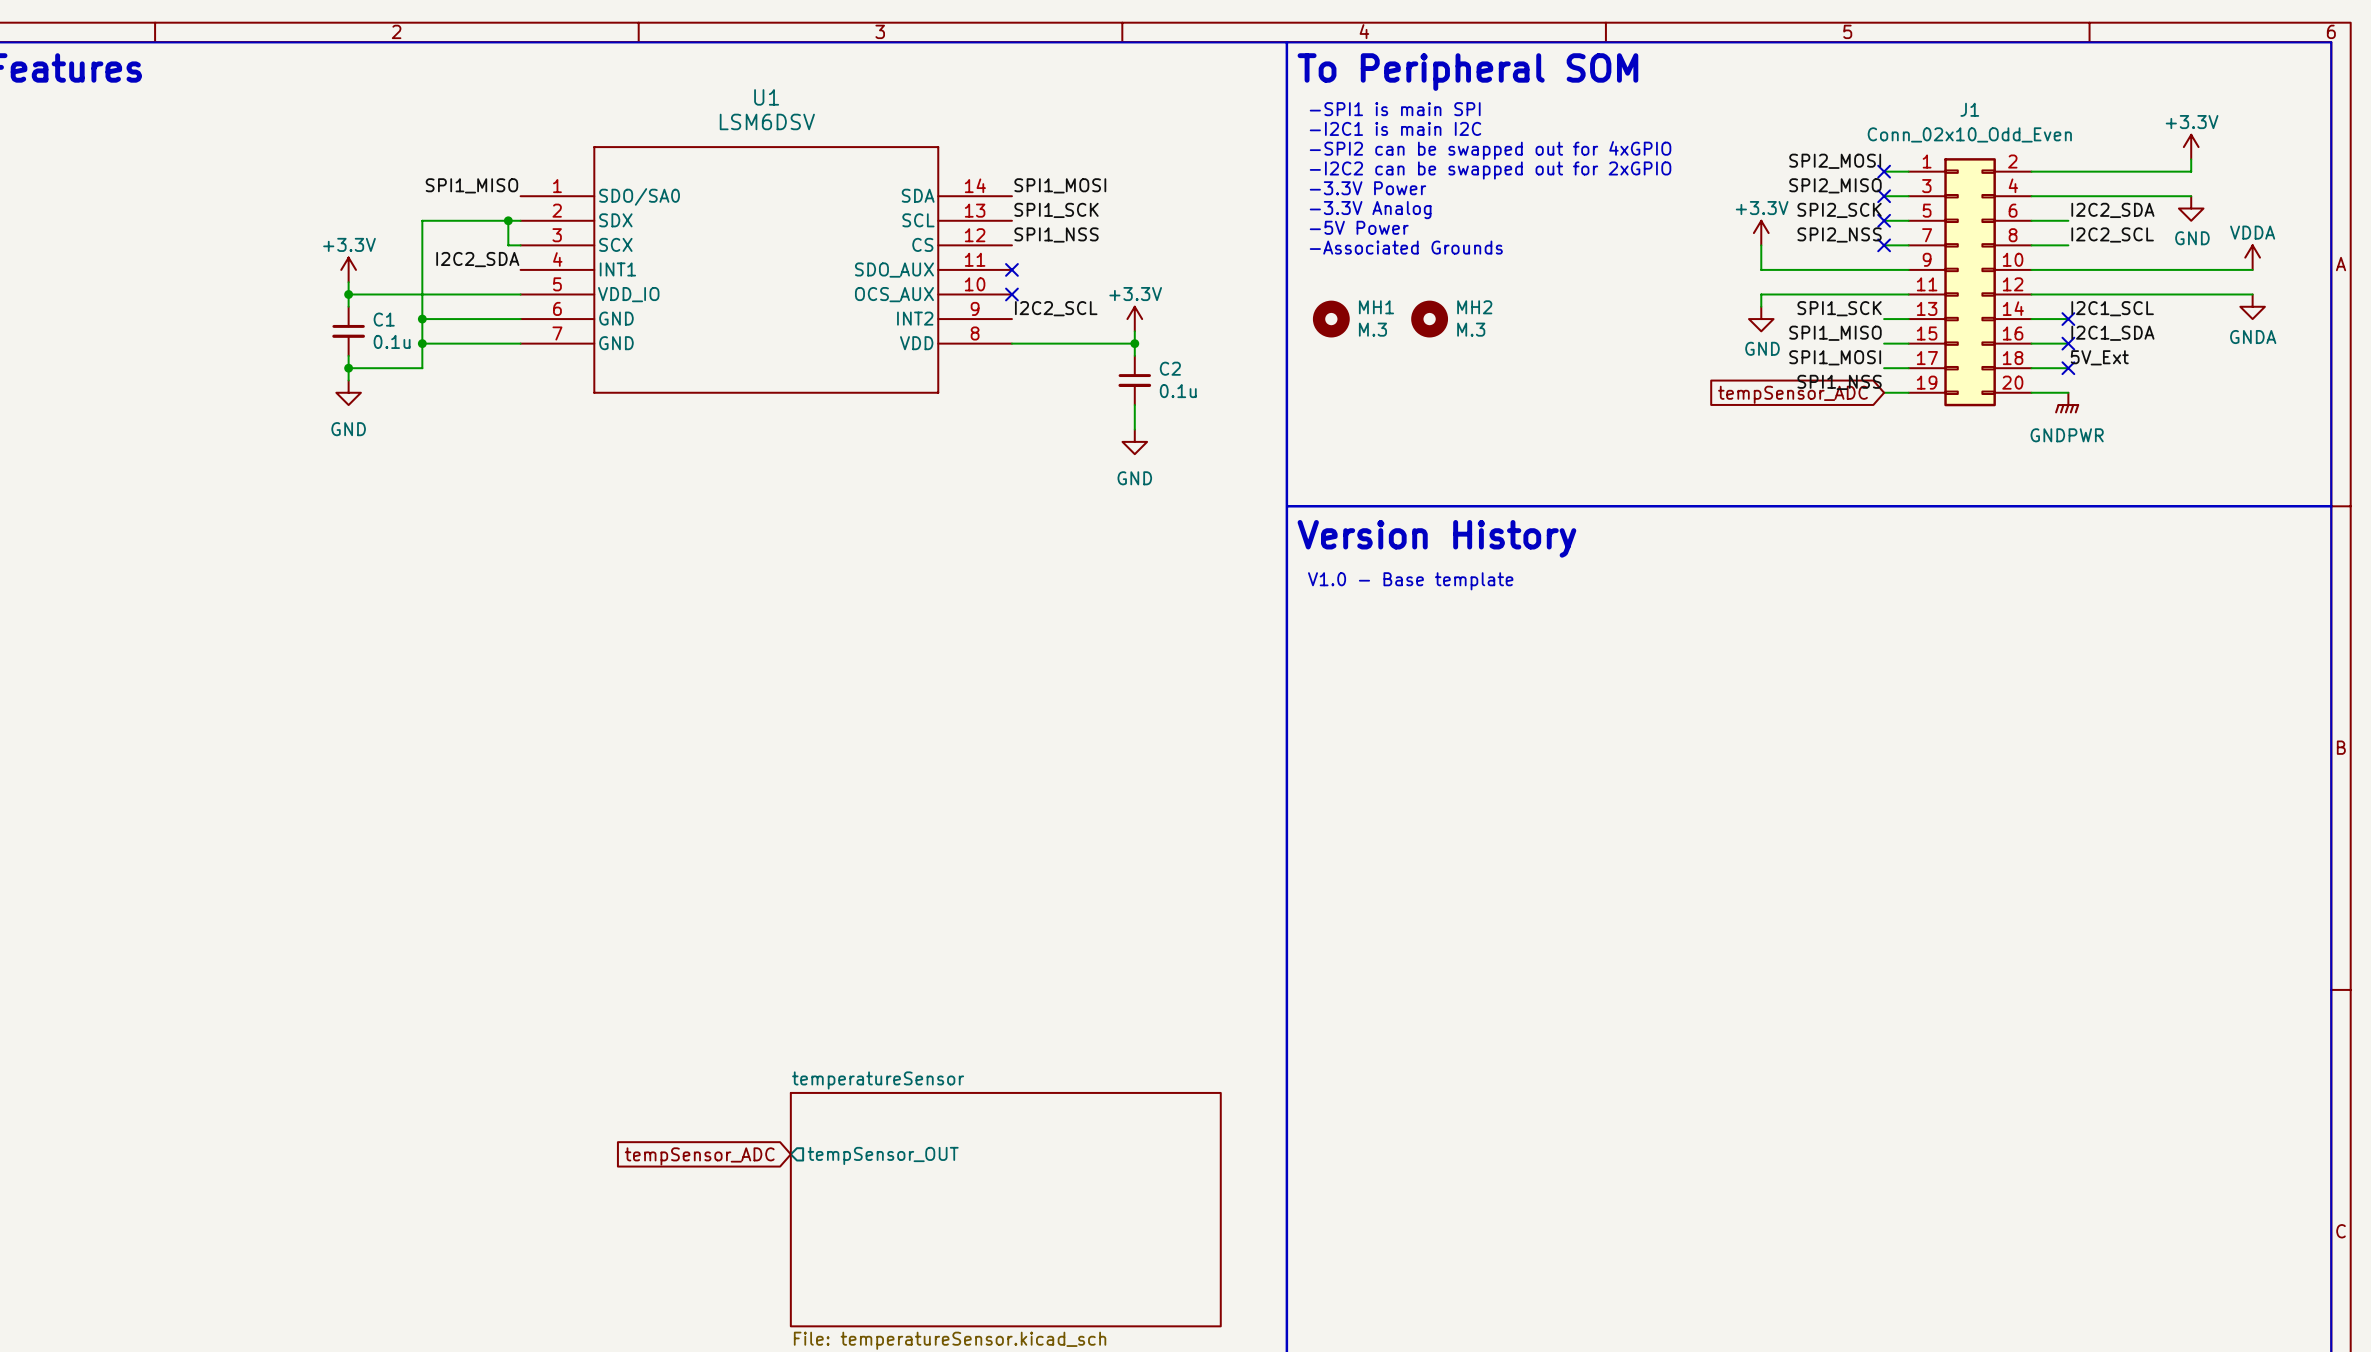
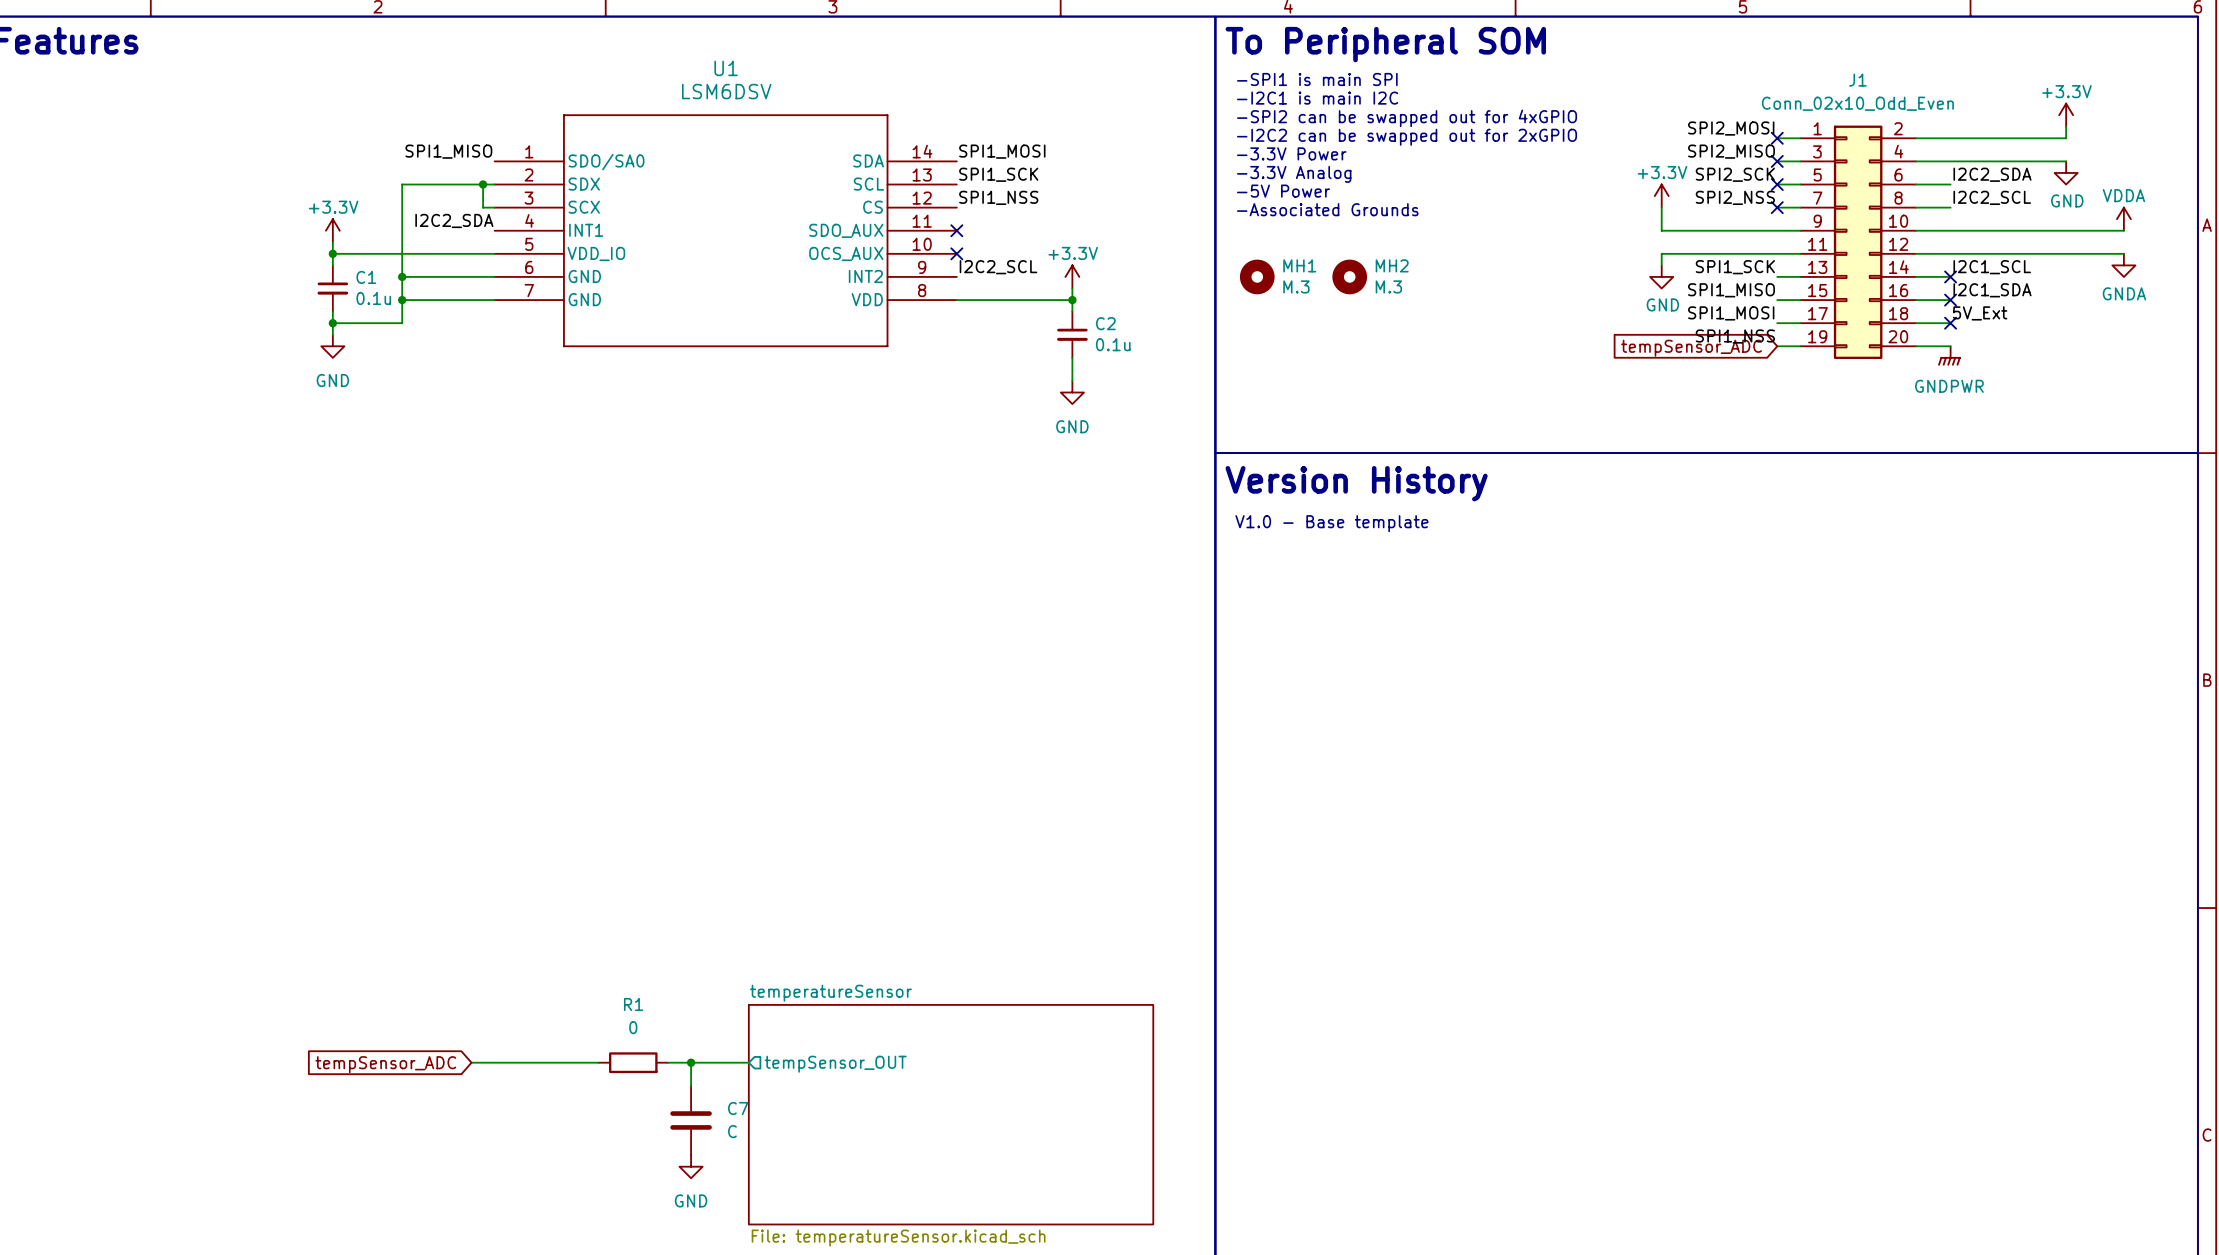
wire: none -> (471, 1062) (598, 1062)
R1: none -> 0 (633, 1062)
wire: none -> (667, 1062) (748, 1062)
wire: none -> (691, 1062) (691, 1085)
junction: none -> (691, 1062)
global label: none -> tempSensor_ADC (385, 1064)
global label: tempSensor_ADC (699, 1156) -> none
C7: none -> C (691, 1120)
power symbol: none -> GND (691, 1166)

